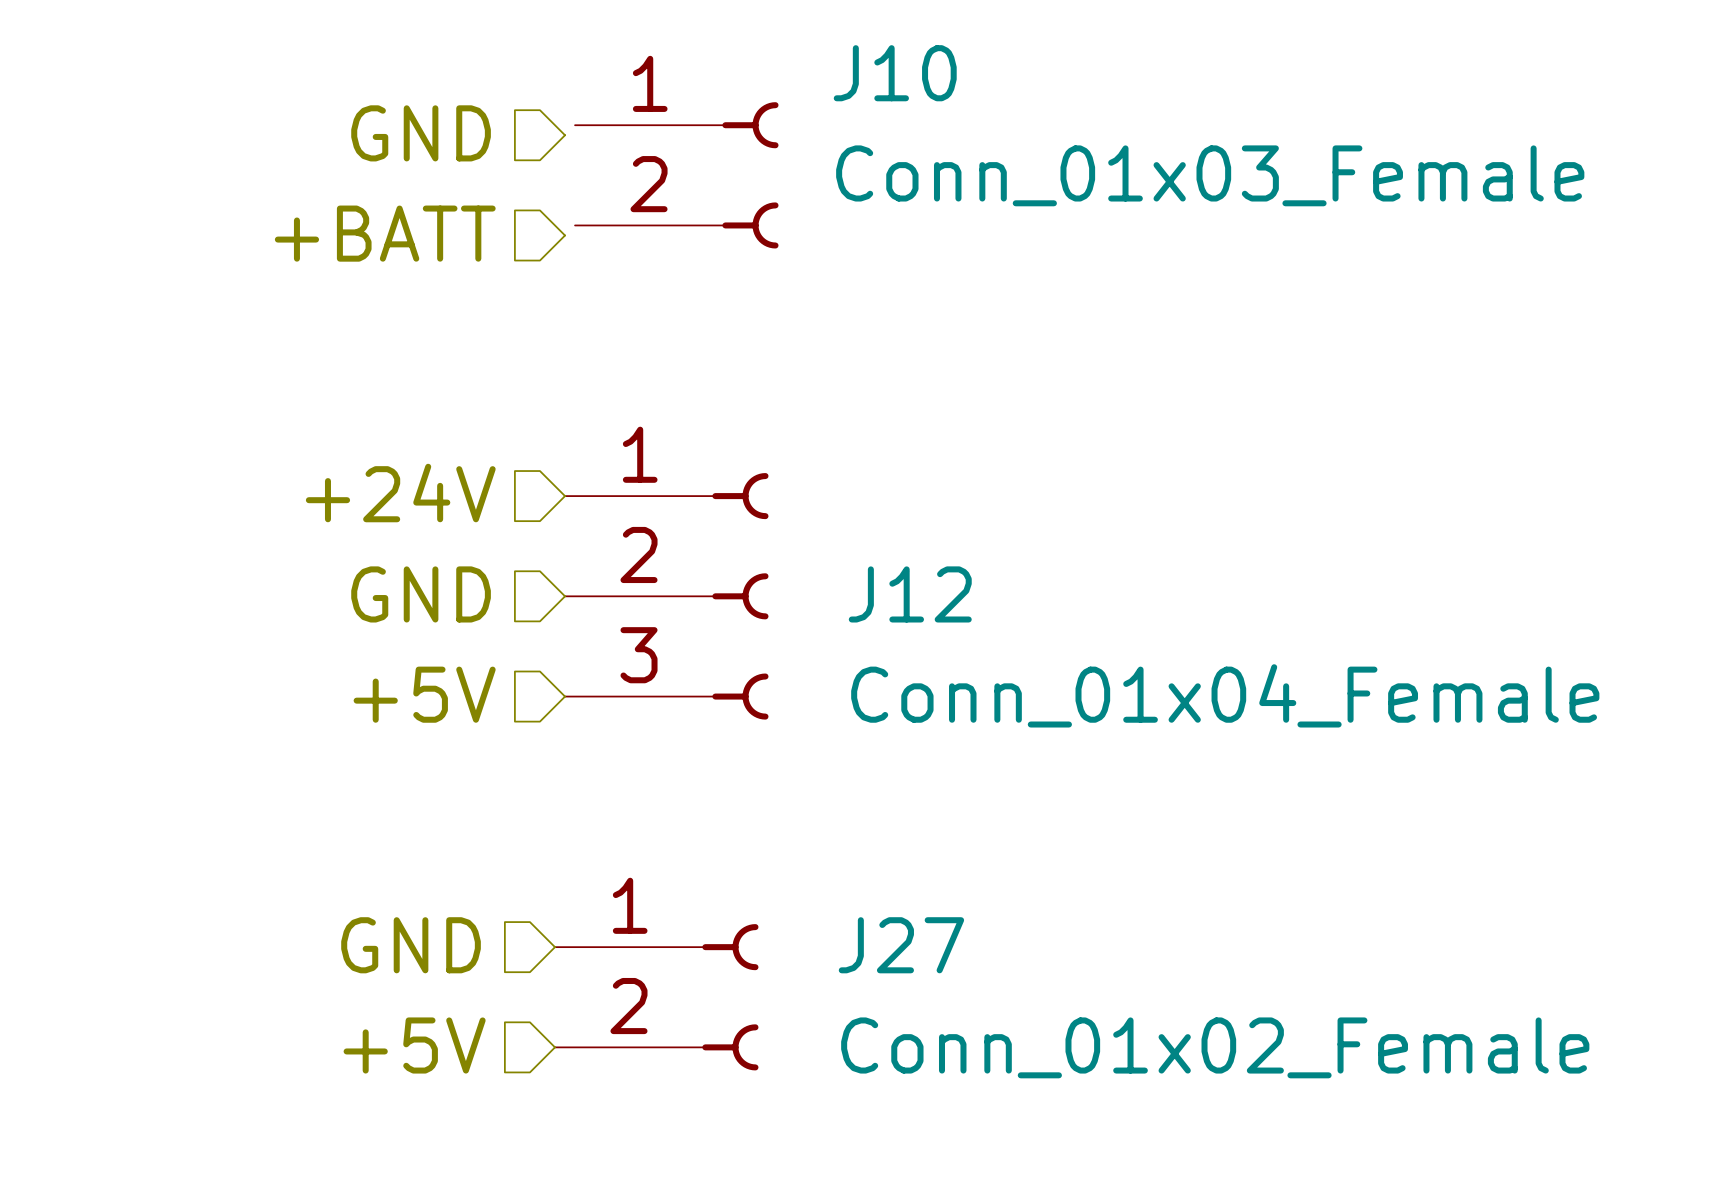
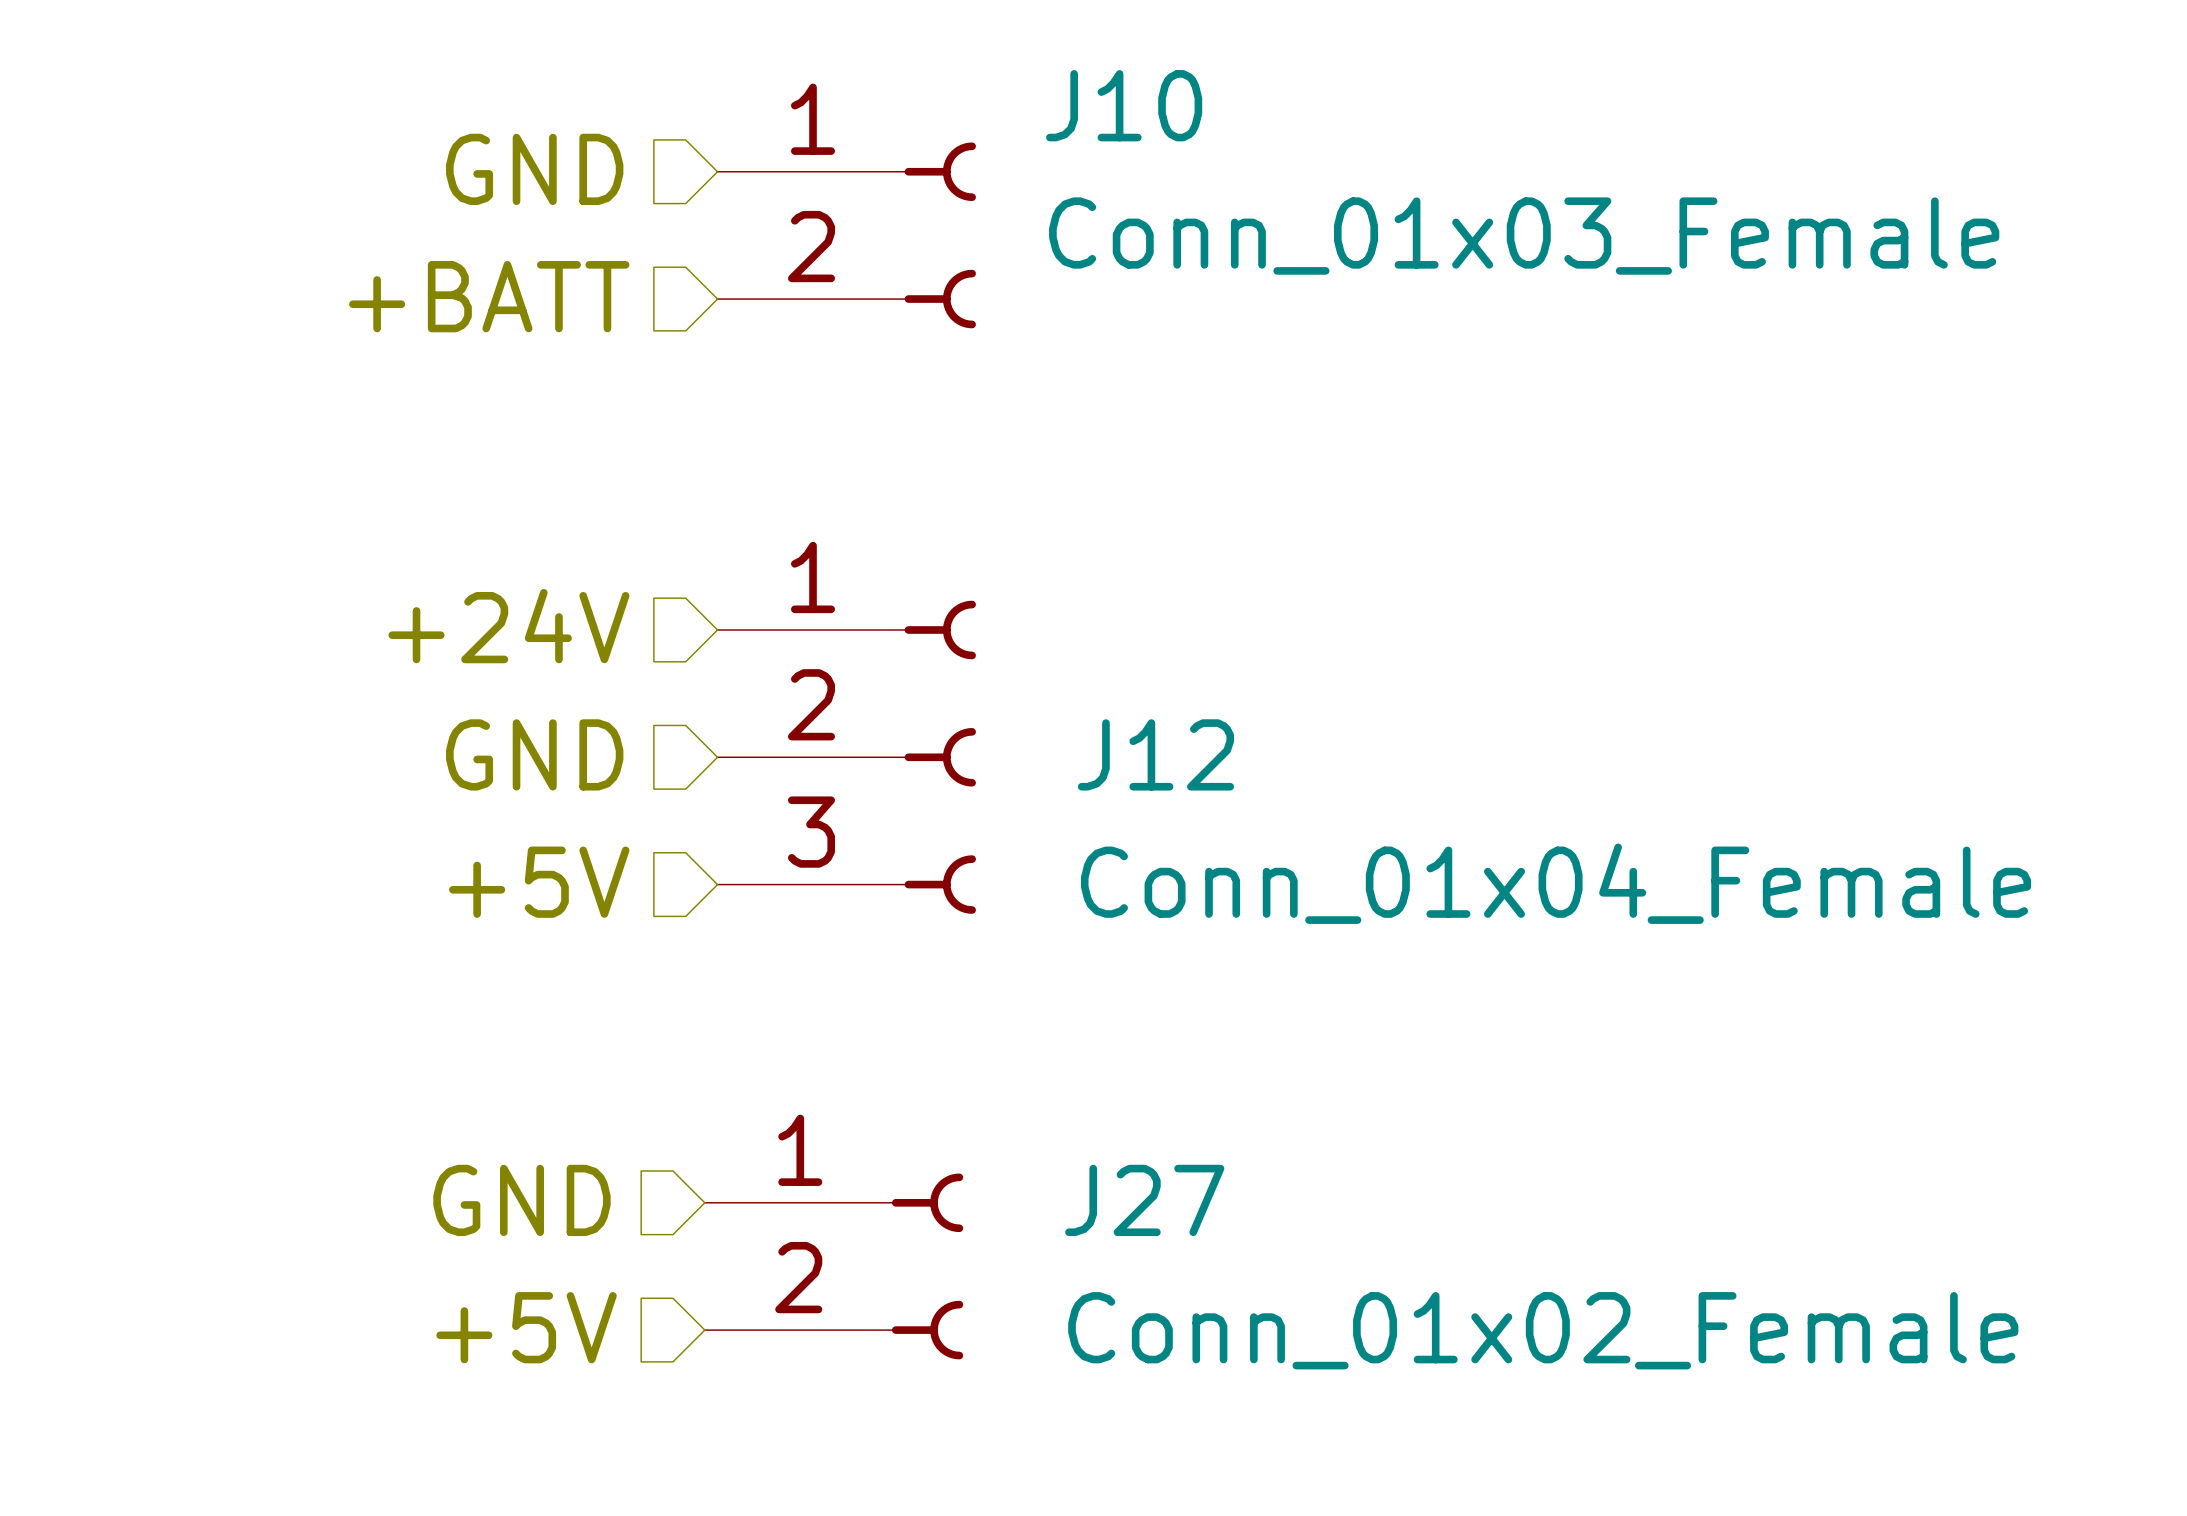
J10 position: (676, 175) -> (846, 235)

